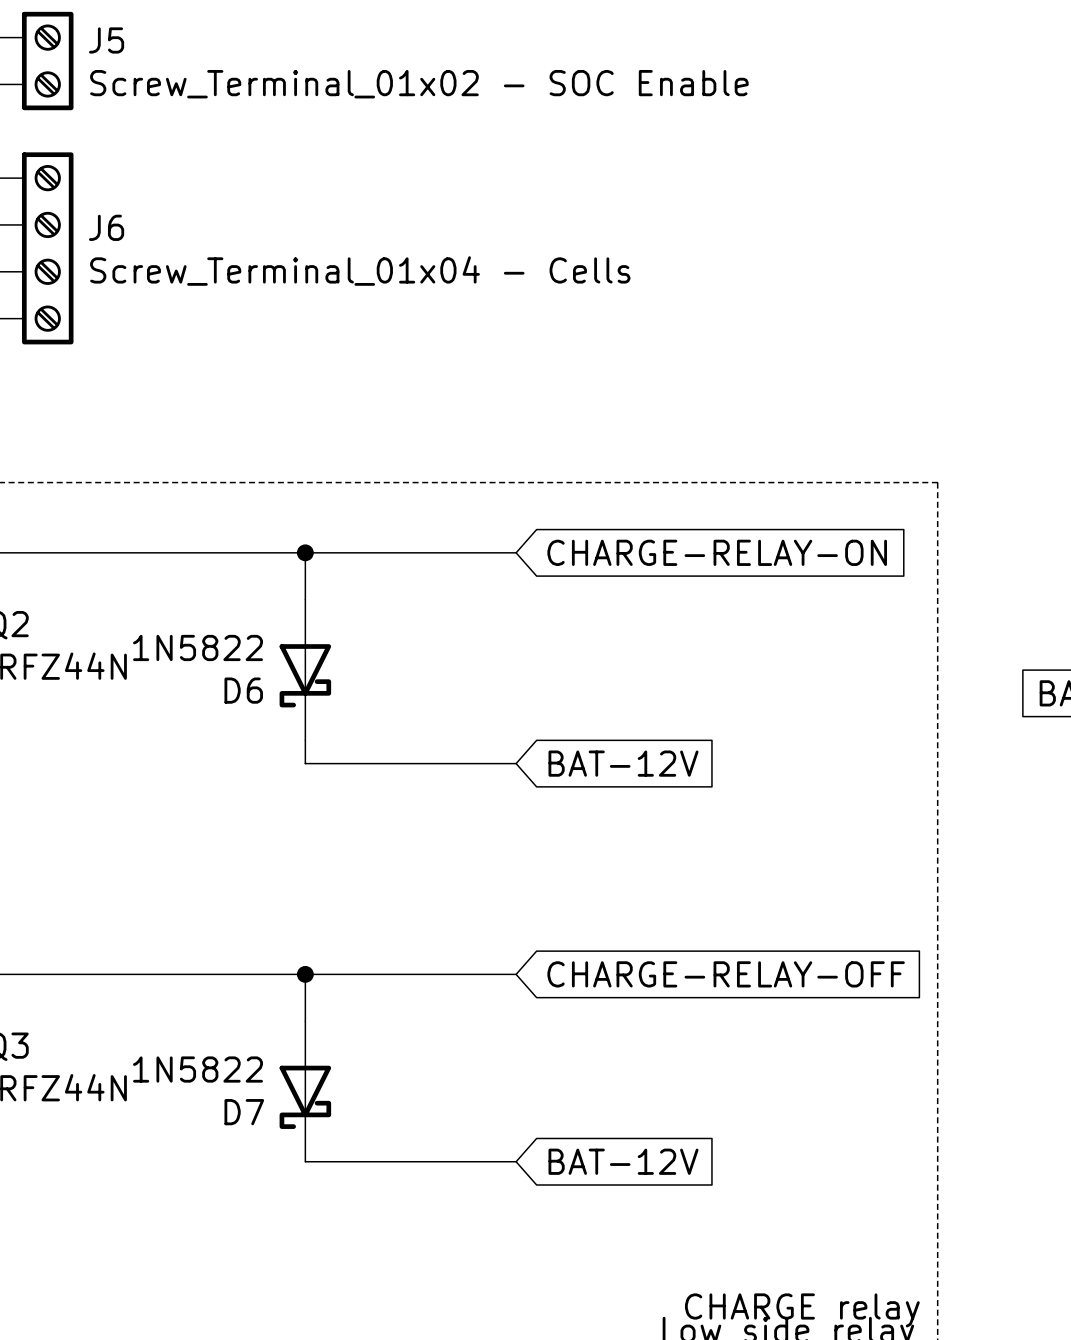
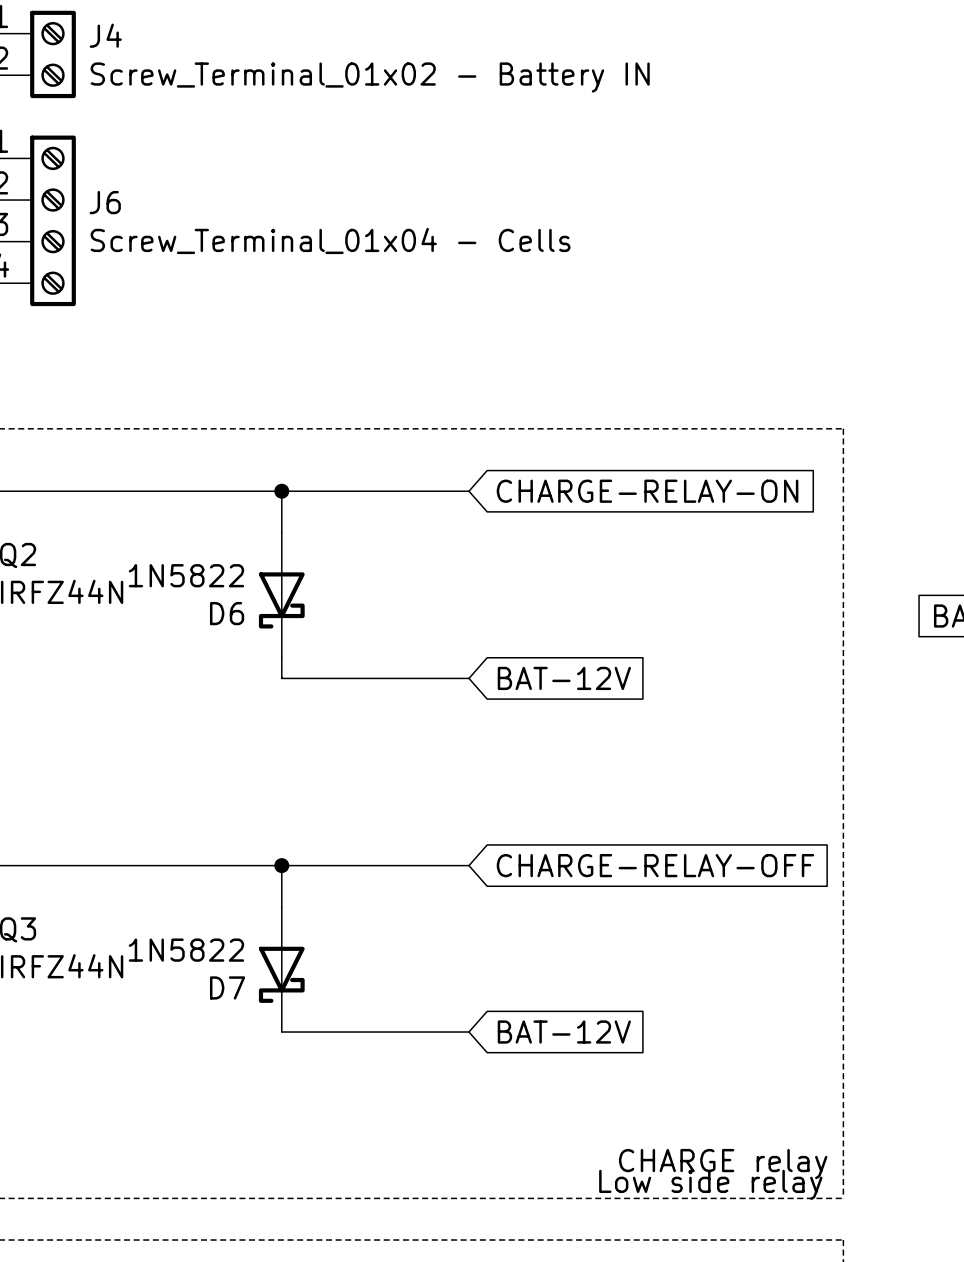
J5 name: J5 (106, 40) -> J4 (105, 35)
J5 value: Screw_Terminal_01x02 - SOC Enable (419, 84) -> Screw_Terminal_01x02 - Battery IN (370, 77)

